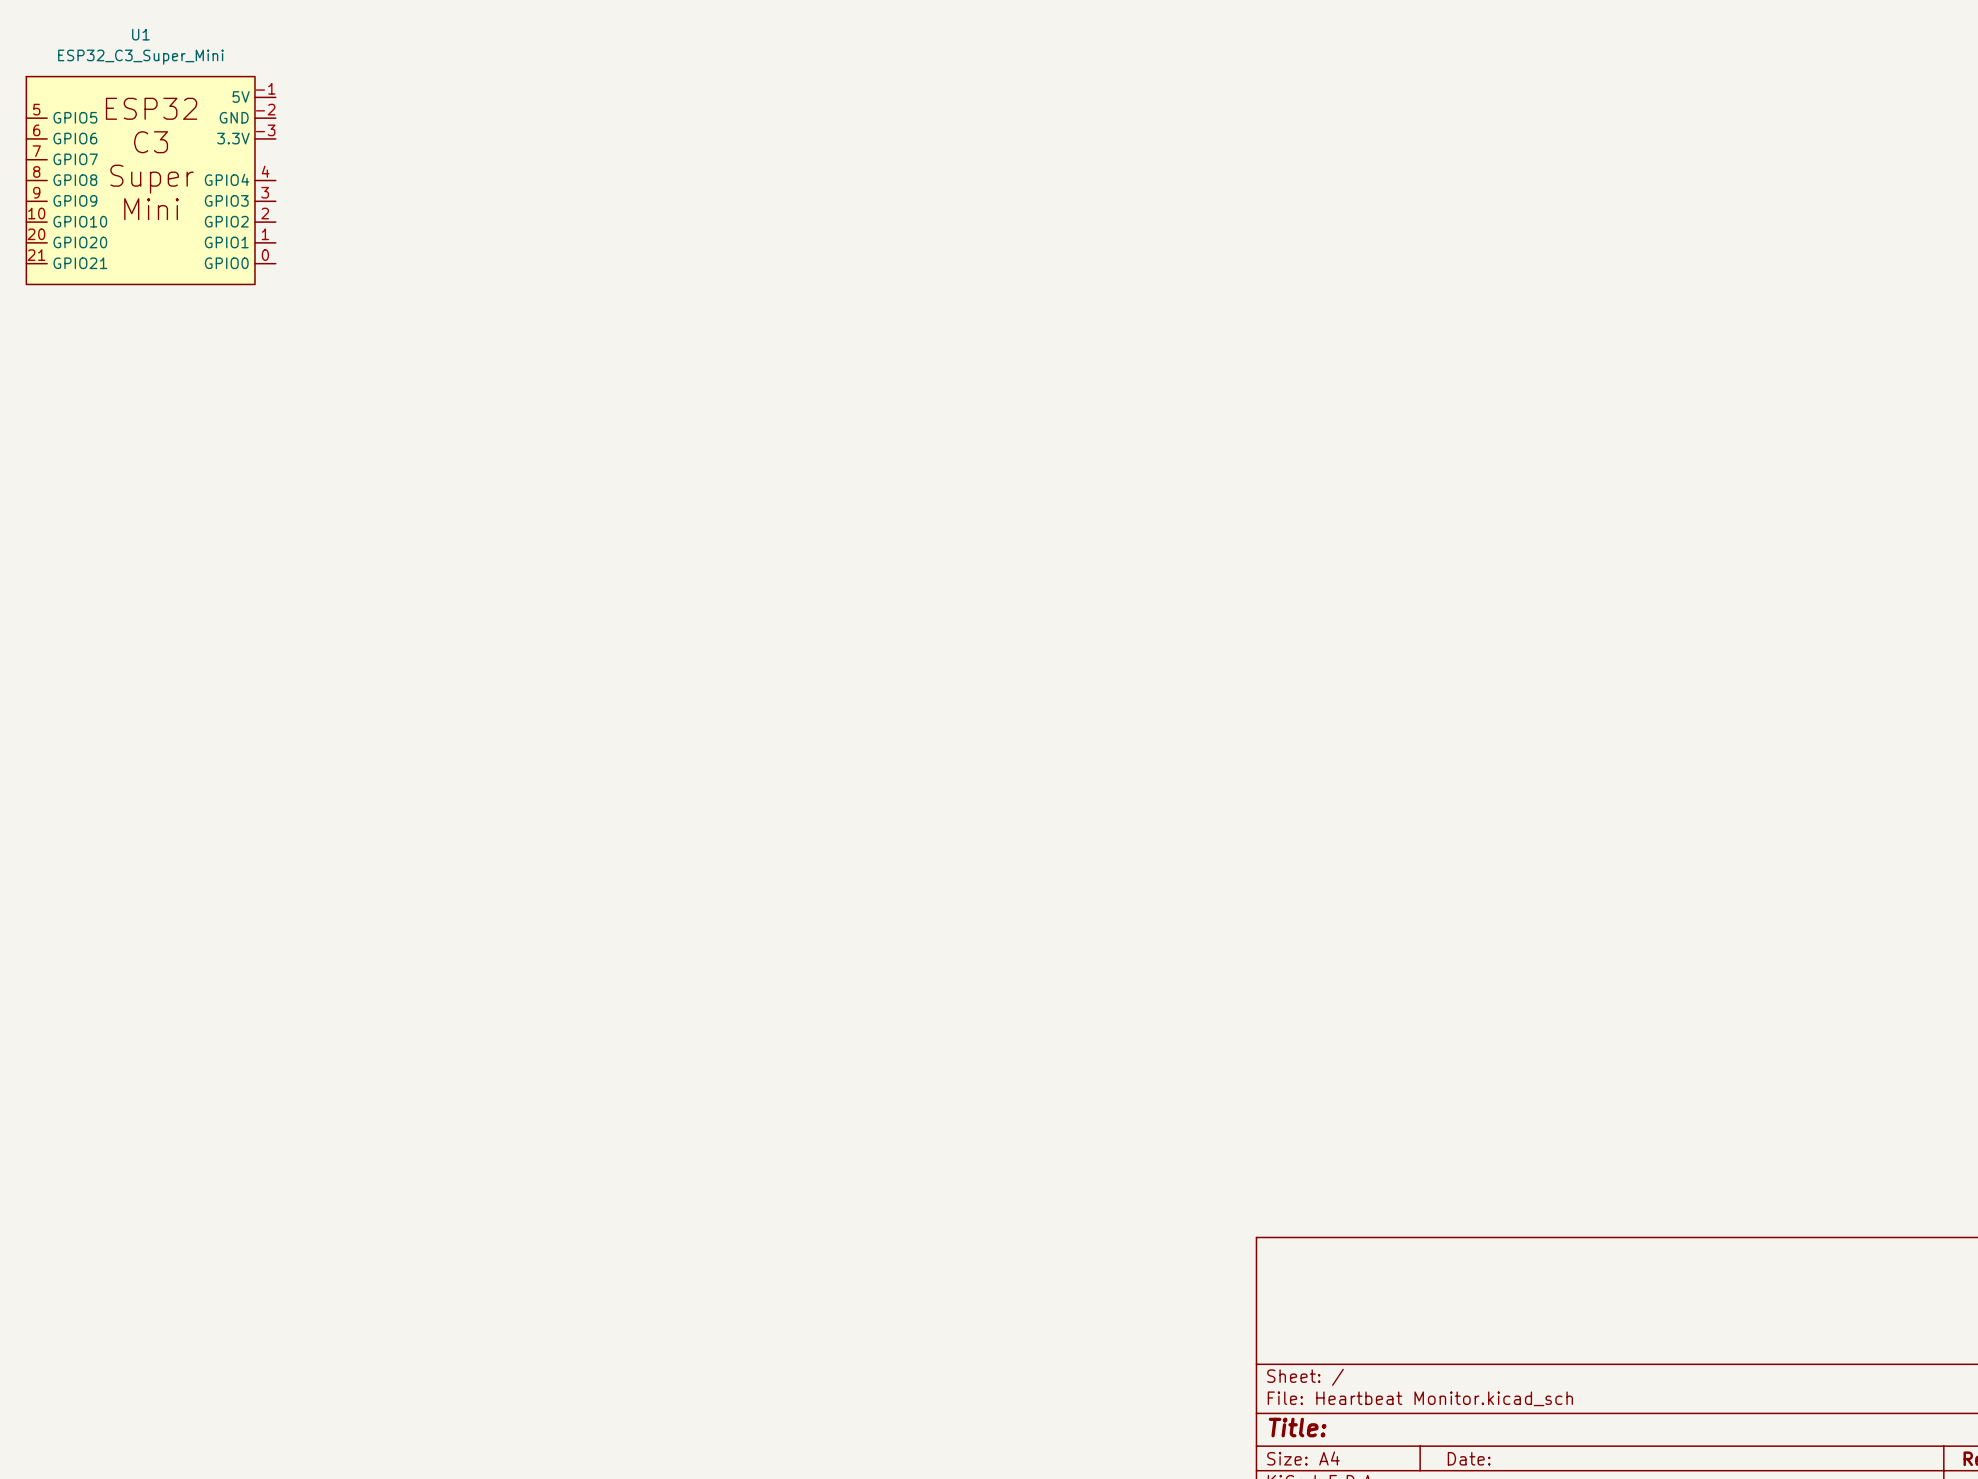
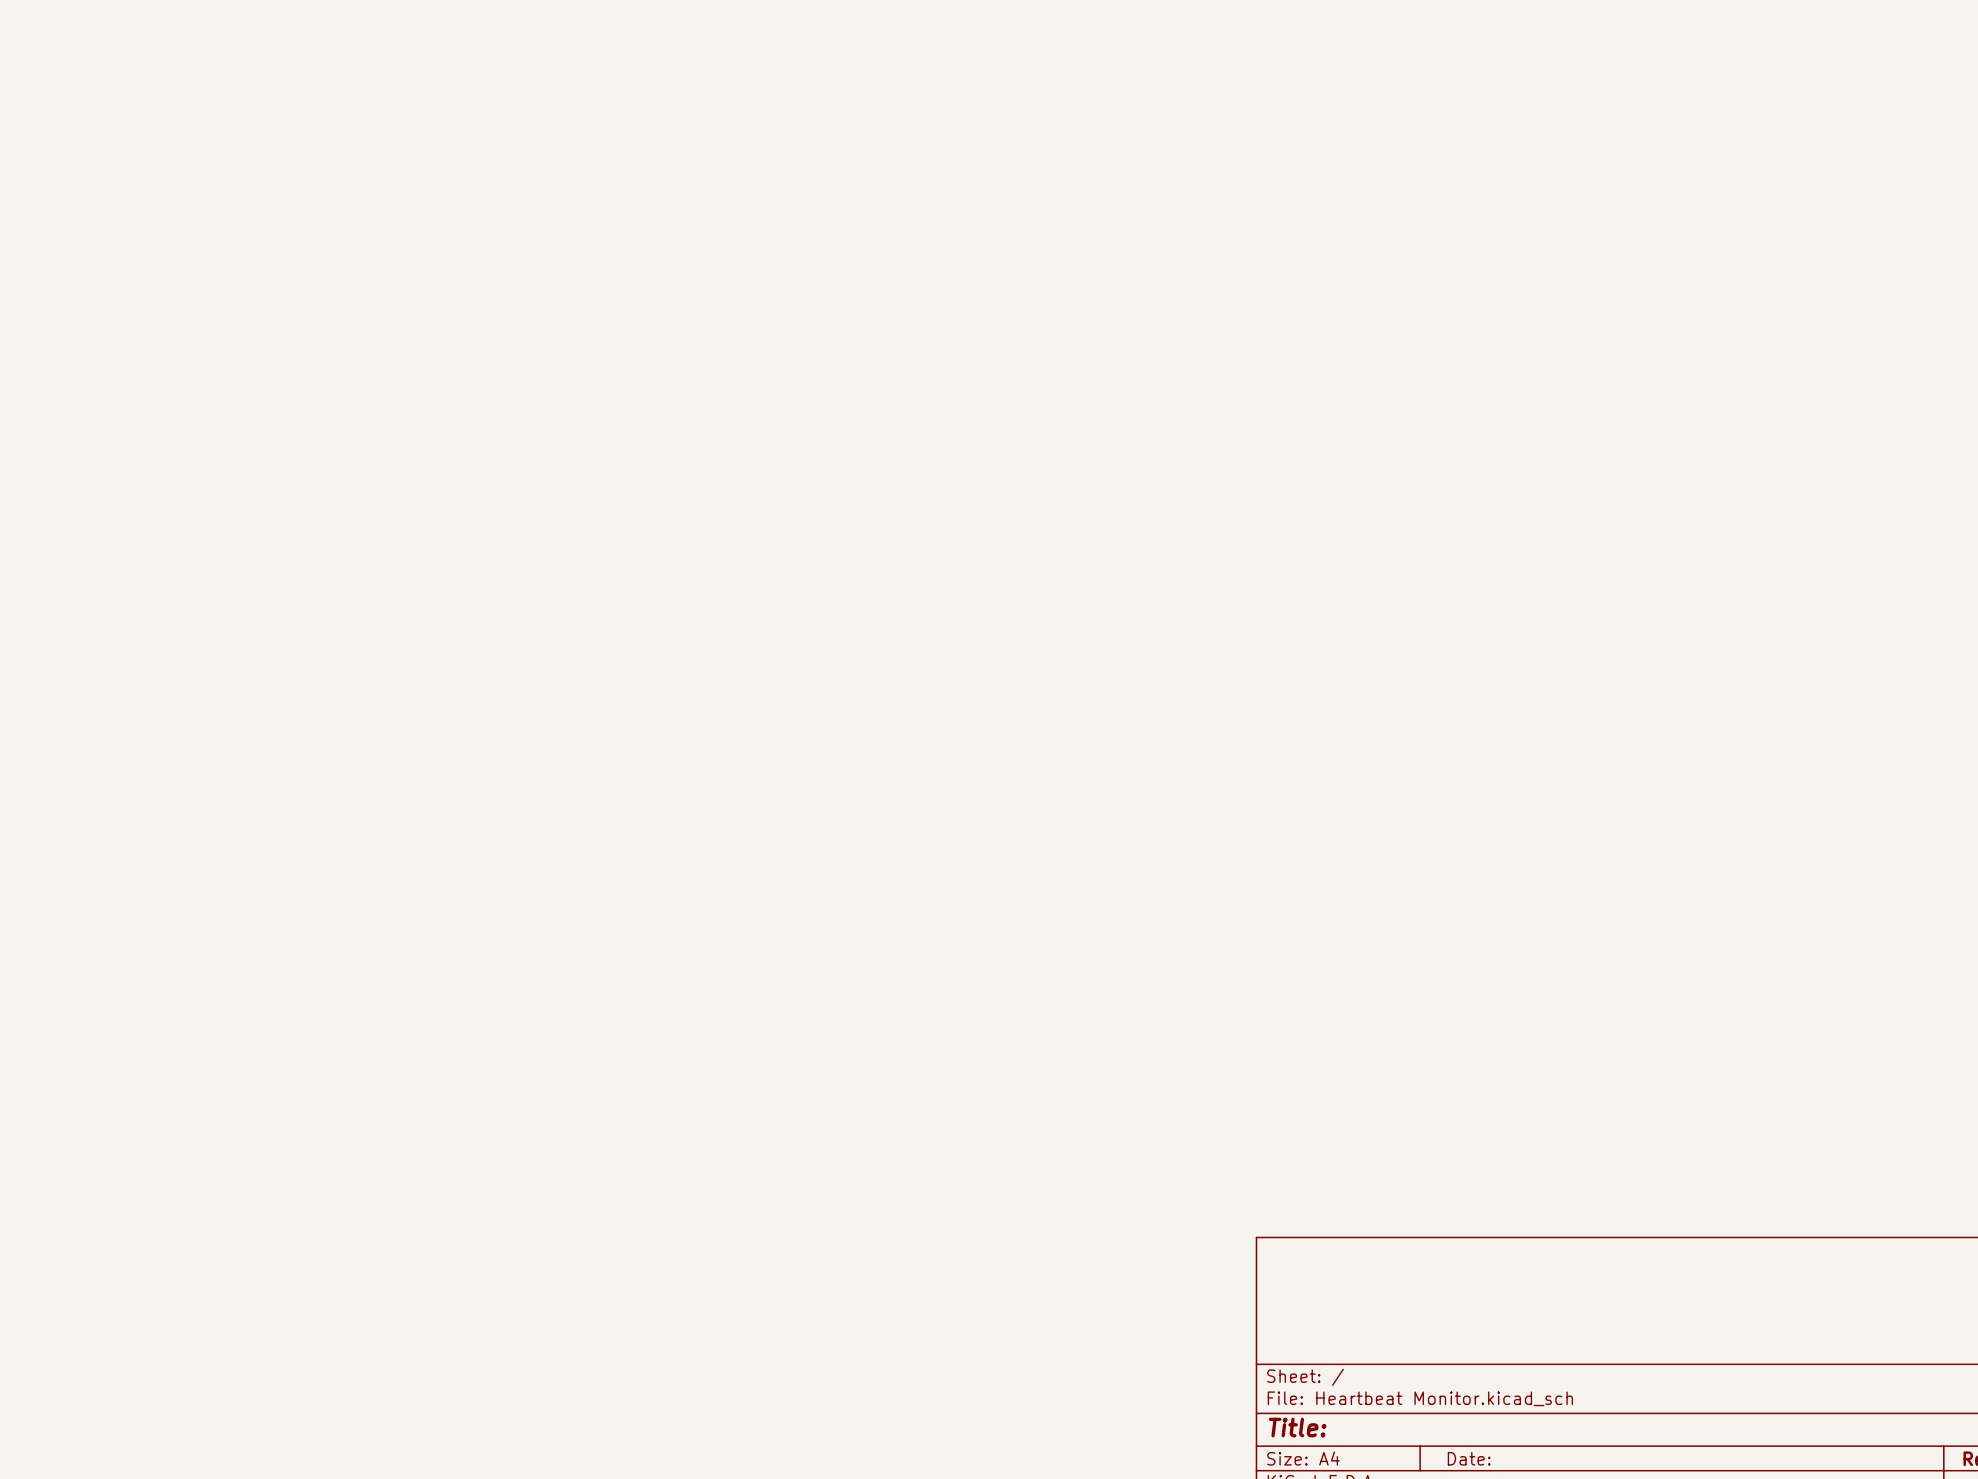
U1: ESP32_C3_Super_Mini (151, 180) -> none

